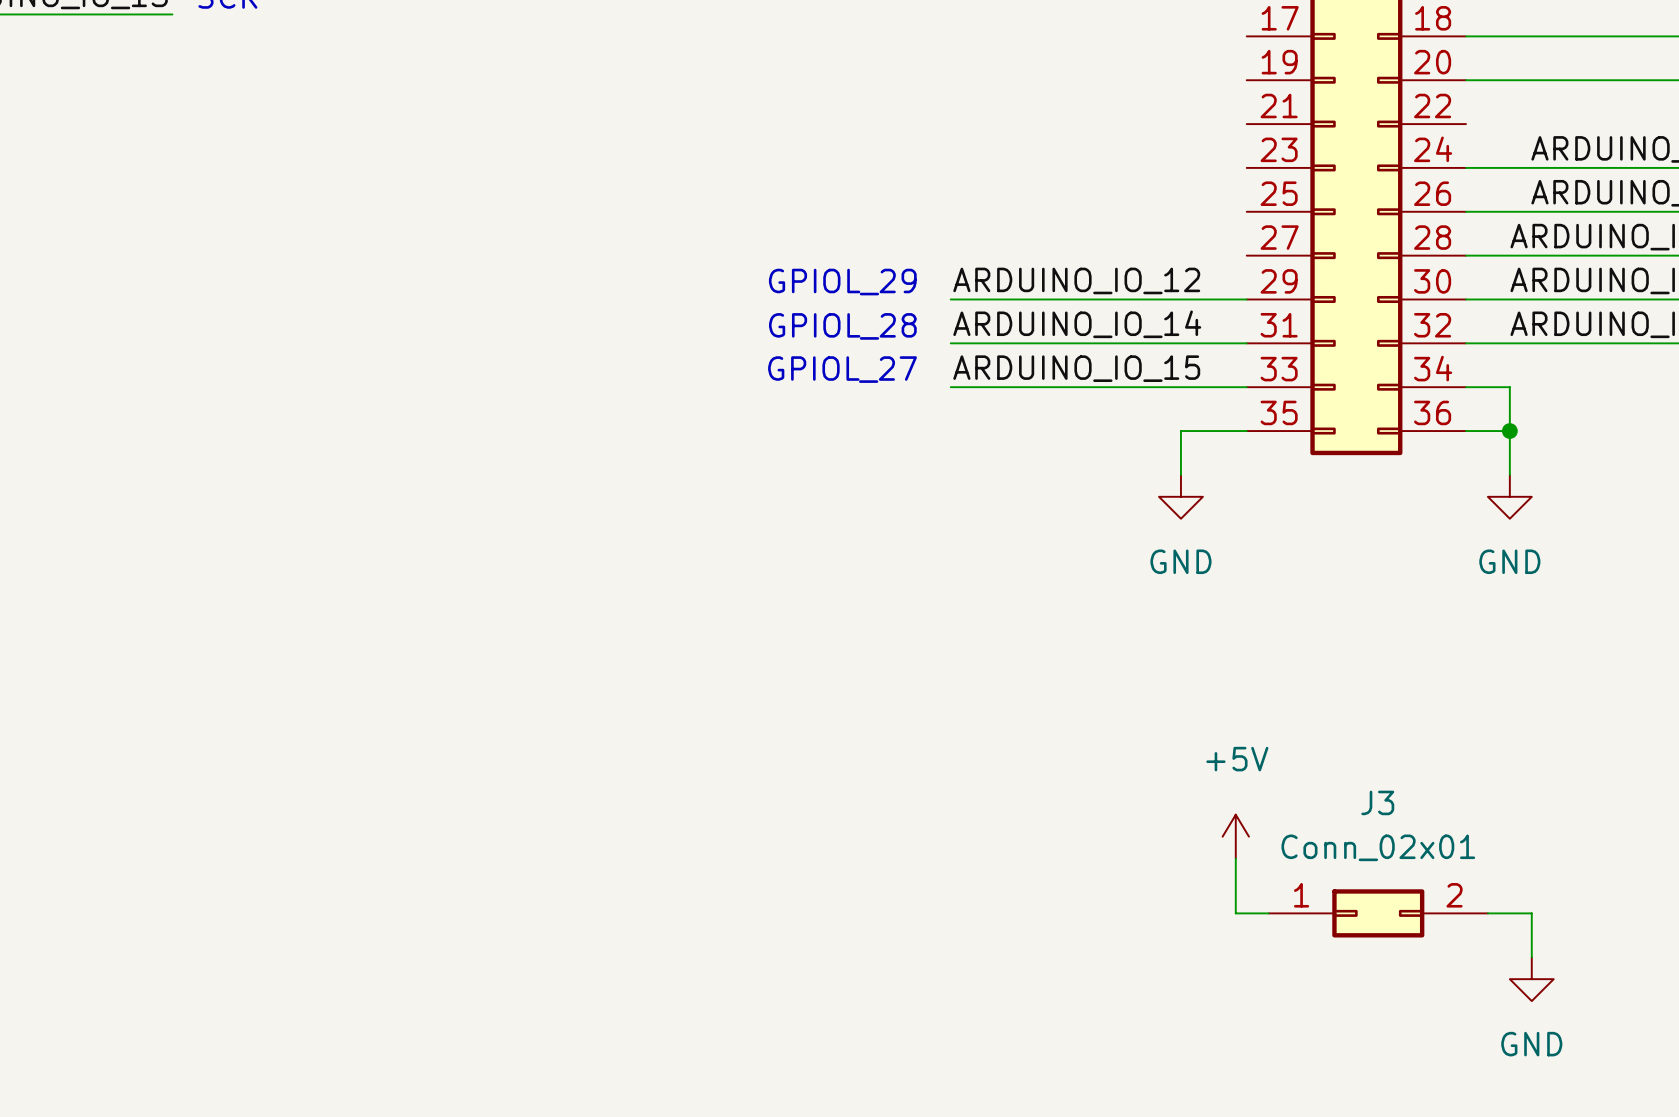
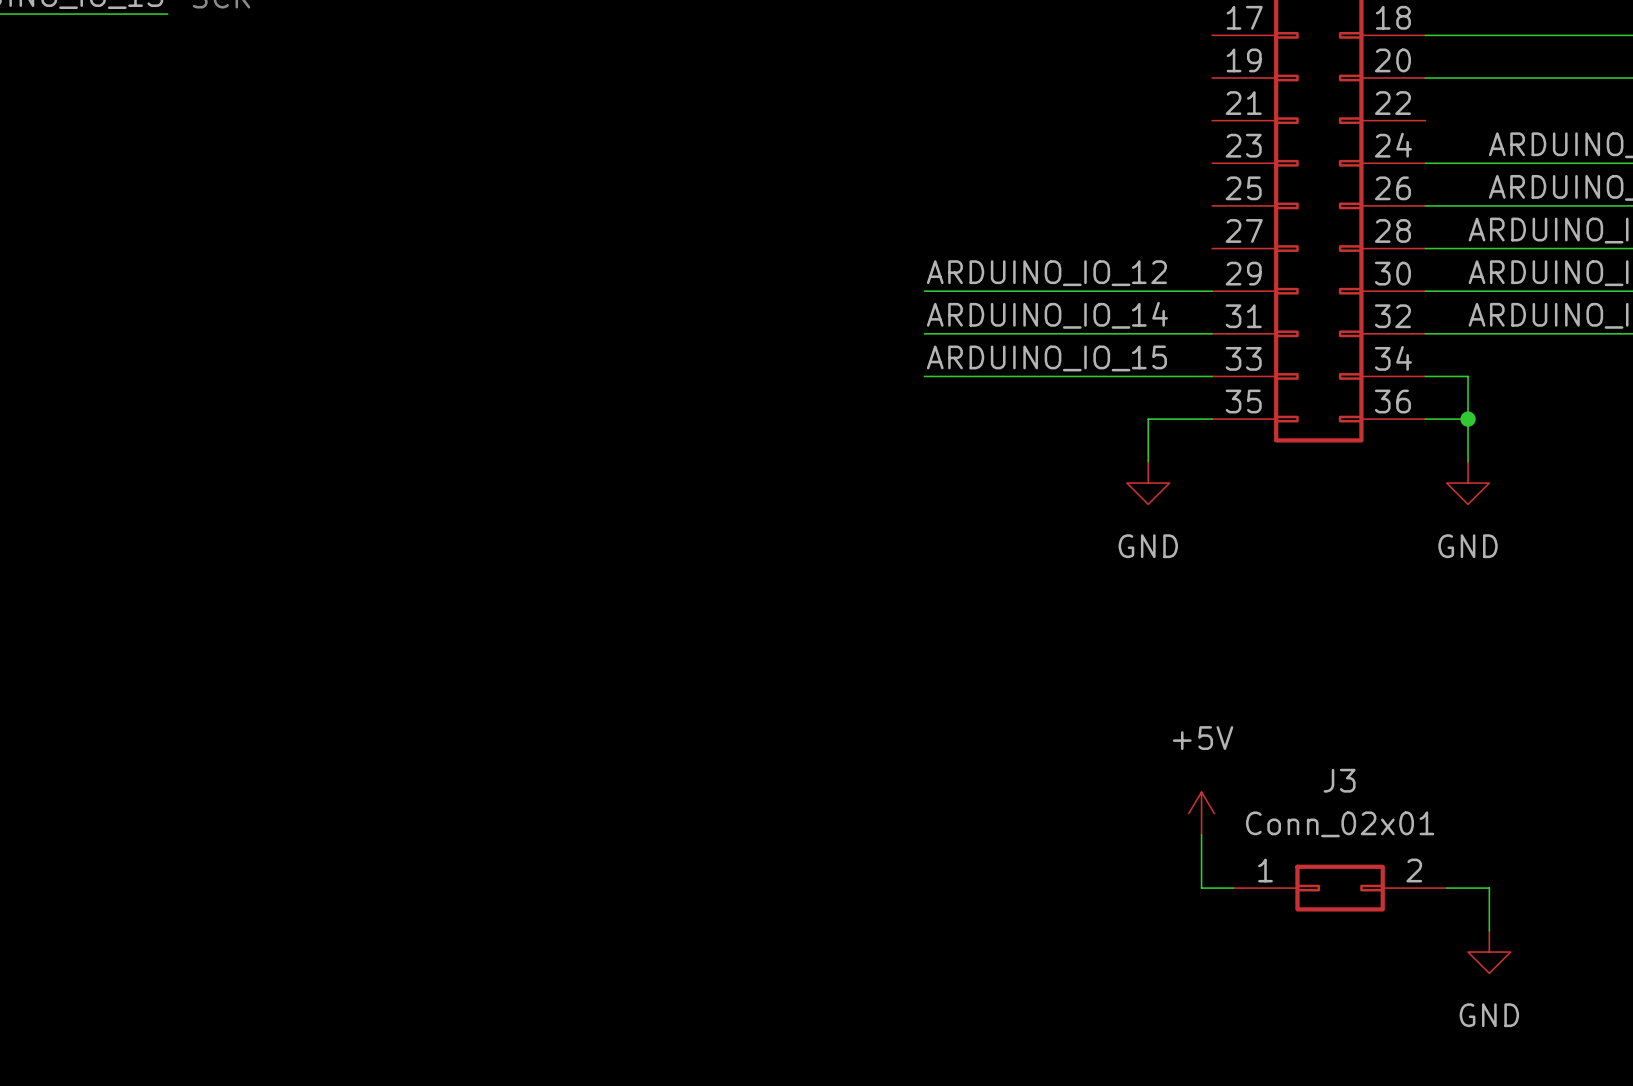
text: GPIOL_29 (842, 282) -> none
text: GPIOL_28 (842, 326) -> none
text: GPIOL_27 (842, 369) -> none

